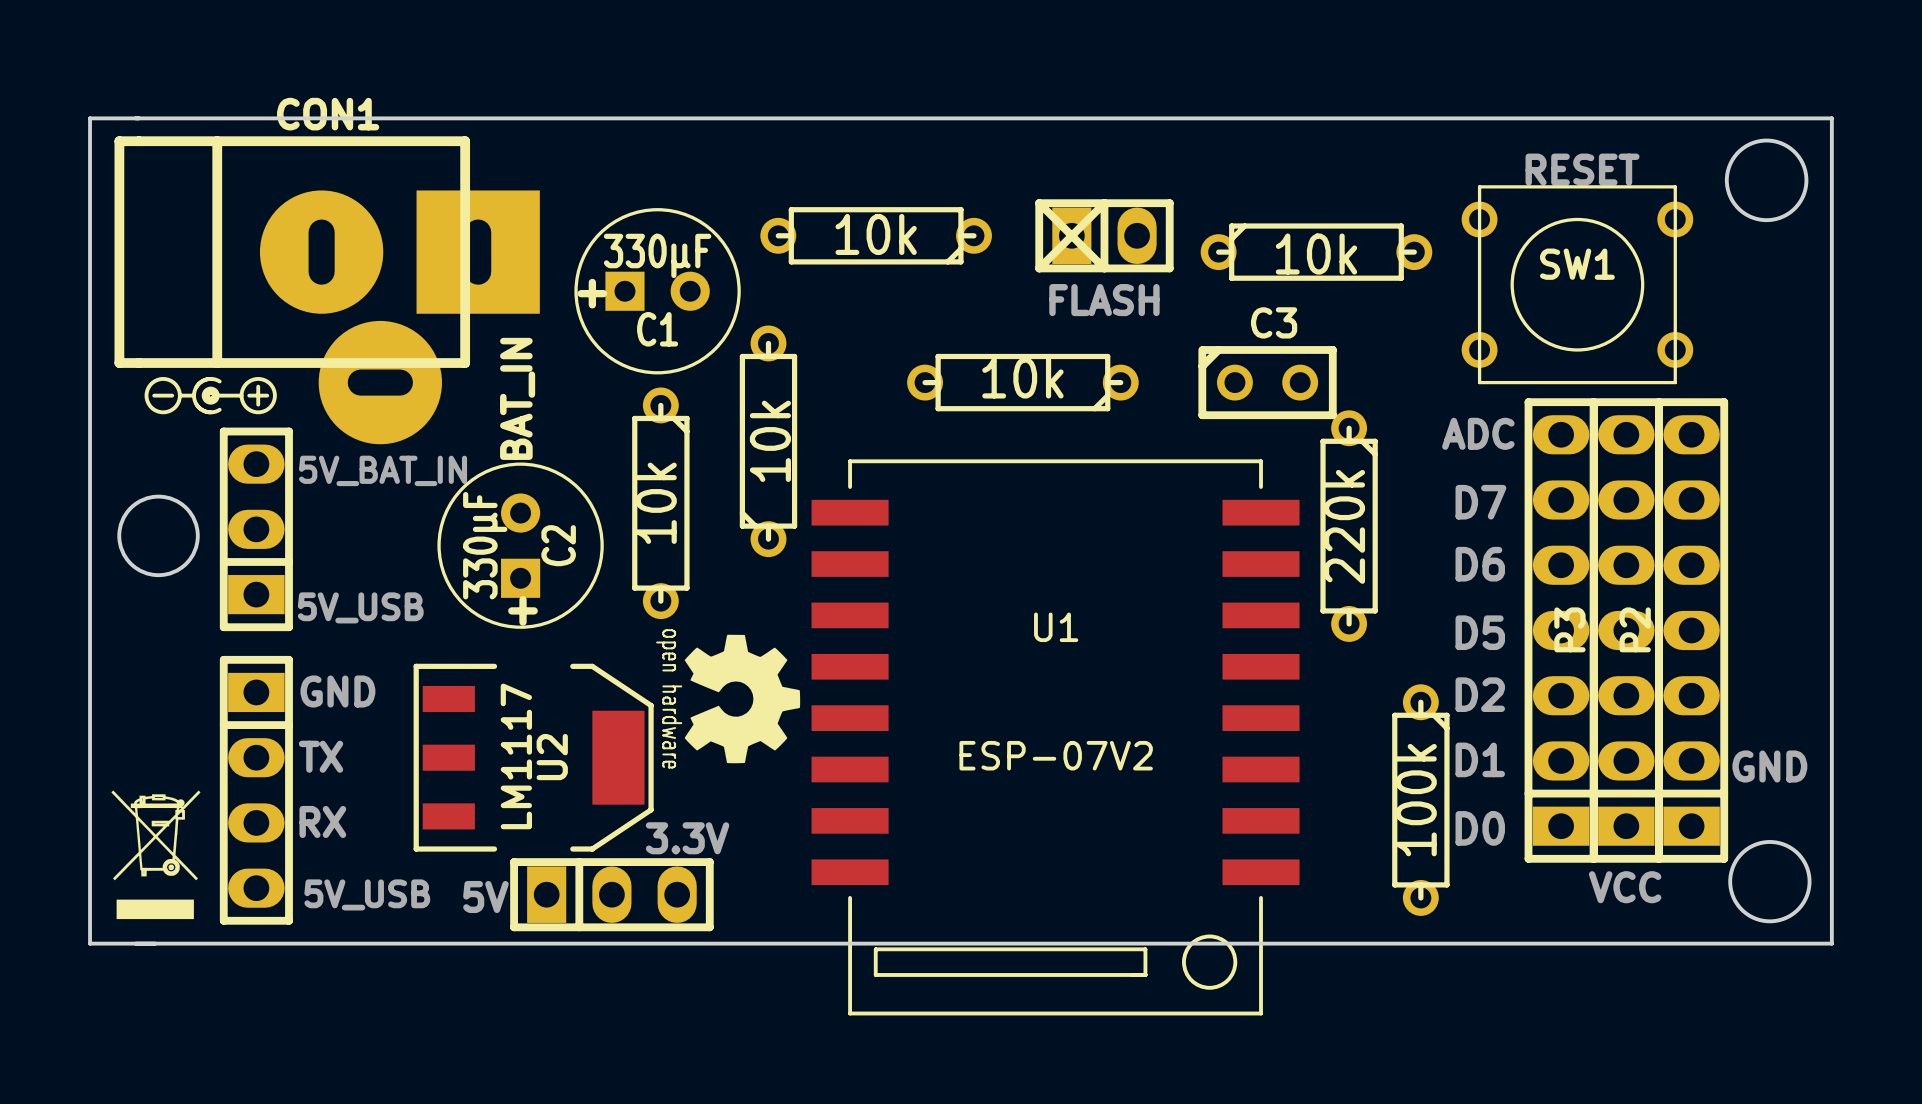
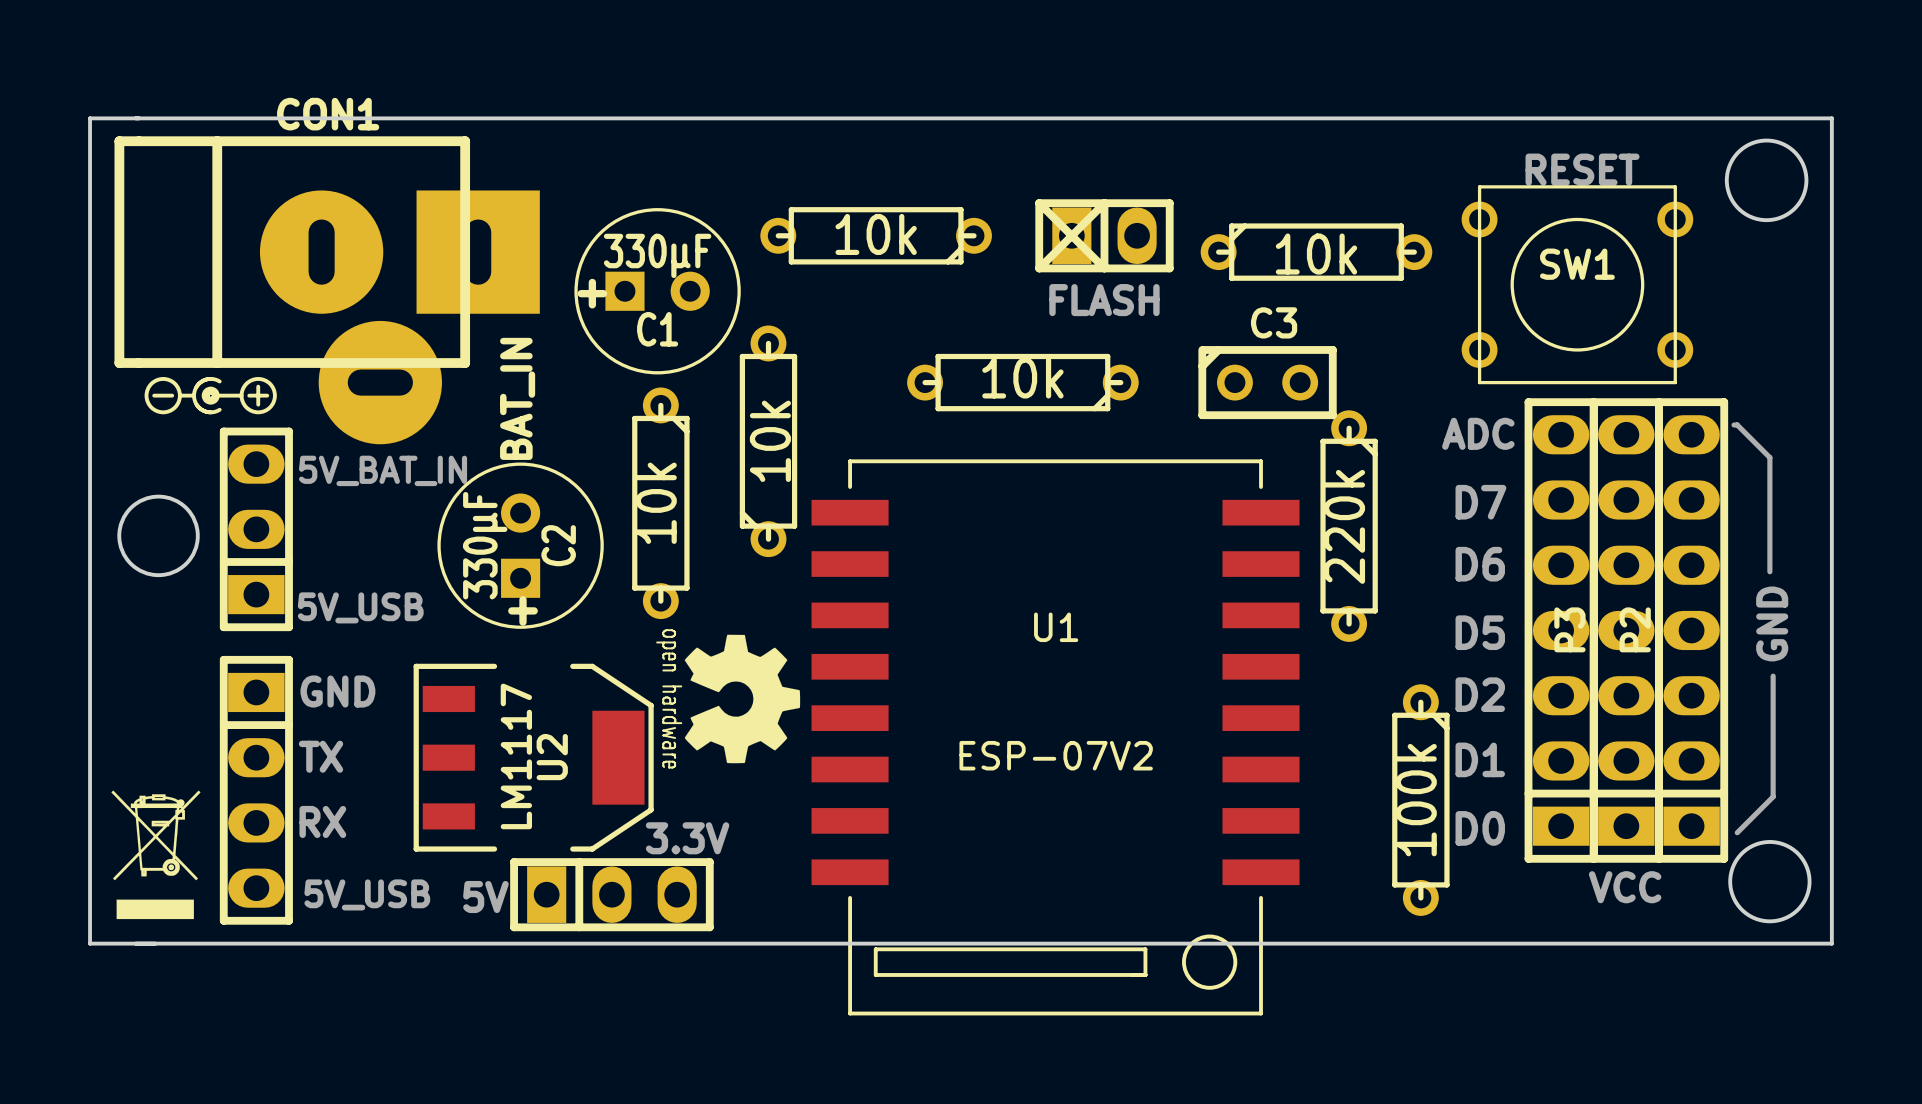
line: none -> (1734, 424) (1737, 424) (1769, 457) (1769, 571)
line: none -> (1773, 676) (1773, 796) (1737, 832)
text rotation: 0° (1769, 766) -> 90° counterclockwise (1772, 623)
text position: GND (1769, 766) -> GND (1772, 623)

